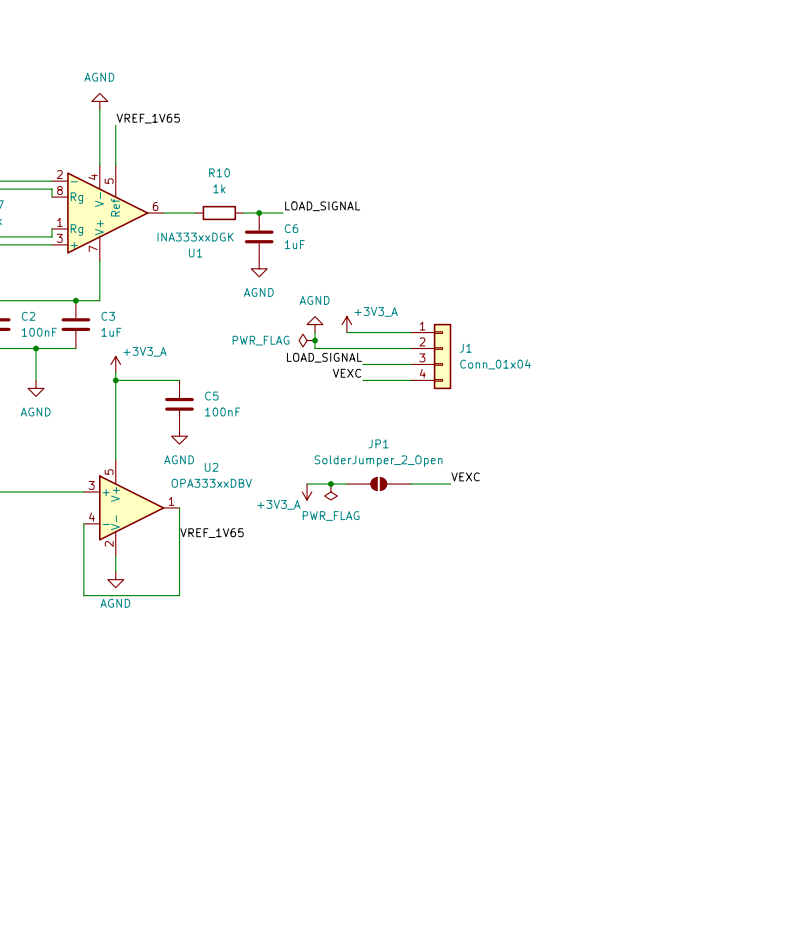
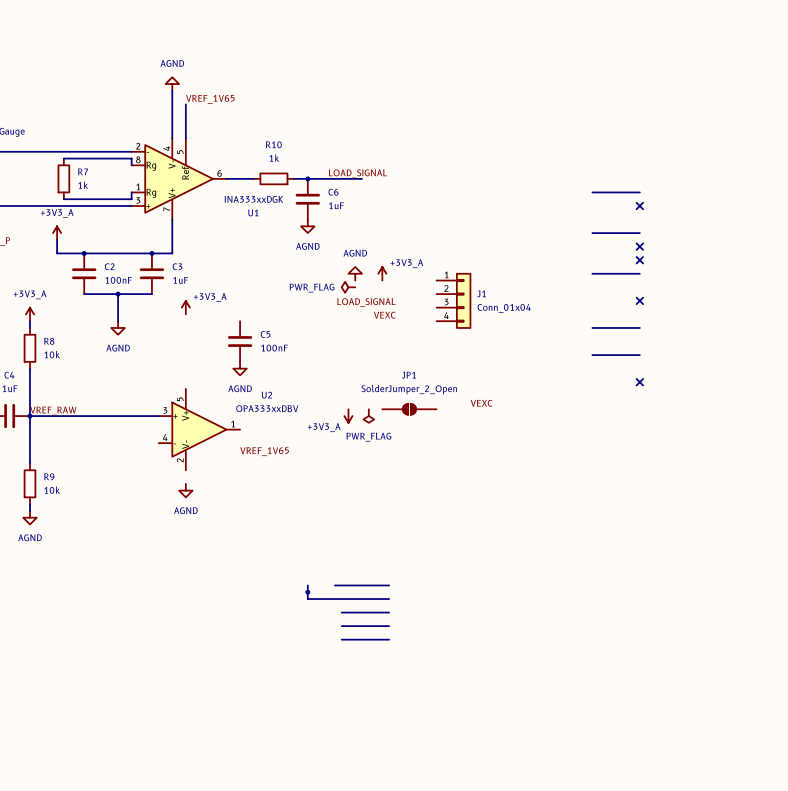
wire: none -> (328, 178) (362, 178)
wire: none -> (592, 192) (639, 192)
no-connect mark: none -> (639, 206)
wire: none -> (592, 233) (639, 233)
no-connect mark: none -> (639, 246)
no-connect mark: none -> (639, 260)
wire: none -> (592, 273) (639, 273)
wire: (315, 332) (315, 348) (410, 348) -> none
wire: (346, 332) (410, 332) -> none
junction: (315, 340) -> none
no-connect mark: none -> (639, 300)
wire: (362, 364) (410, 364) -> none
wire: (115, 372) (115, 460) -> none
wire: (115, 380) (179, 380) -> none
junction: (115, 380) -> none
wire: (362, 380) (410, 380) -> none
wire: none -> (592, 327) (639, 327)
wire: none -> (592, 355) (639, 355)
no-connect mark: none -> (639, 382)
wire: (307, 484) (346, 484) -> none
junction: (330, 484) -> none
wire: (410, 484) (450, 484) -> none
wire: (179, 507) (179, 595) (83, 595) (83, 523) -> none
wire: (115, 555) (115, 571) -> none
wire: none -> (307, 585) (307, 599) (389, 599)
wire: none -> (334, 585) (389, 585)
junction: none -> (307, 592)
wire: none -> (341, 612) (389, 612)
wire: none -> (341, 626) (389, 626)
wire: none -> (341, 639) (389, 639)

